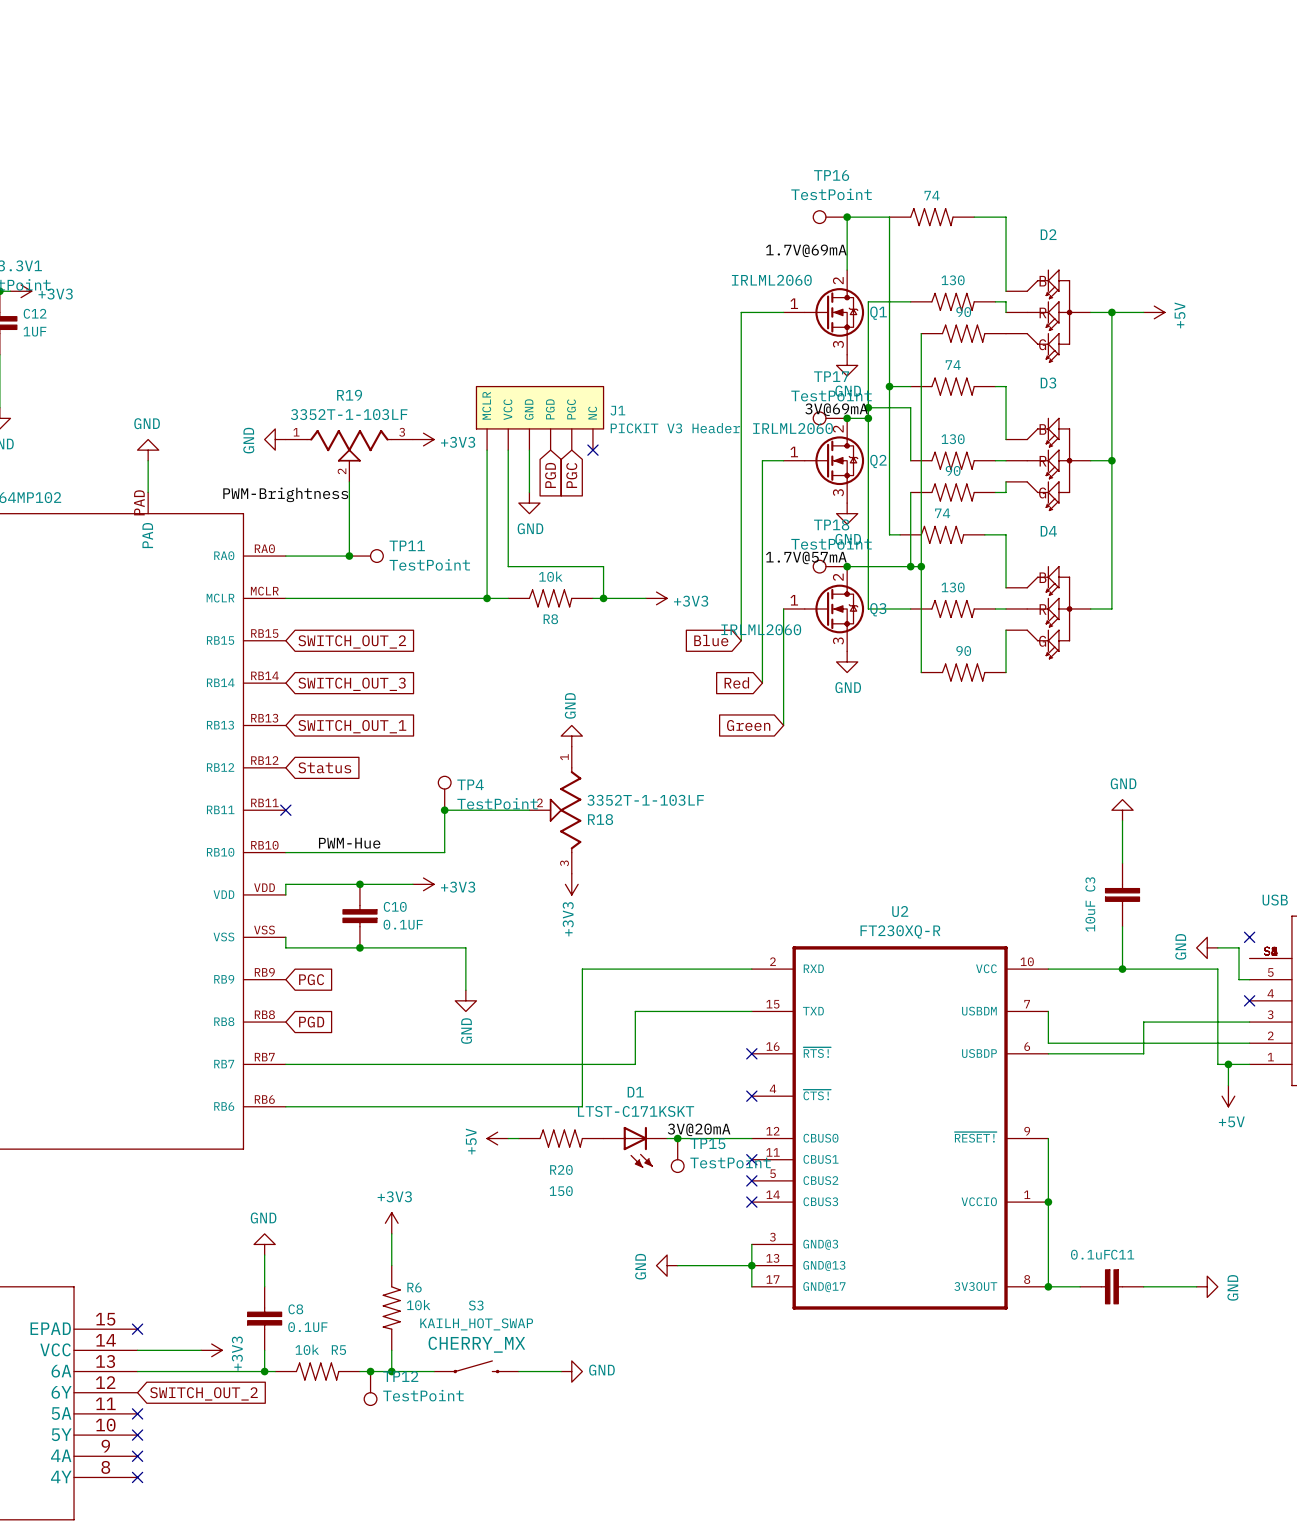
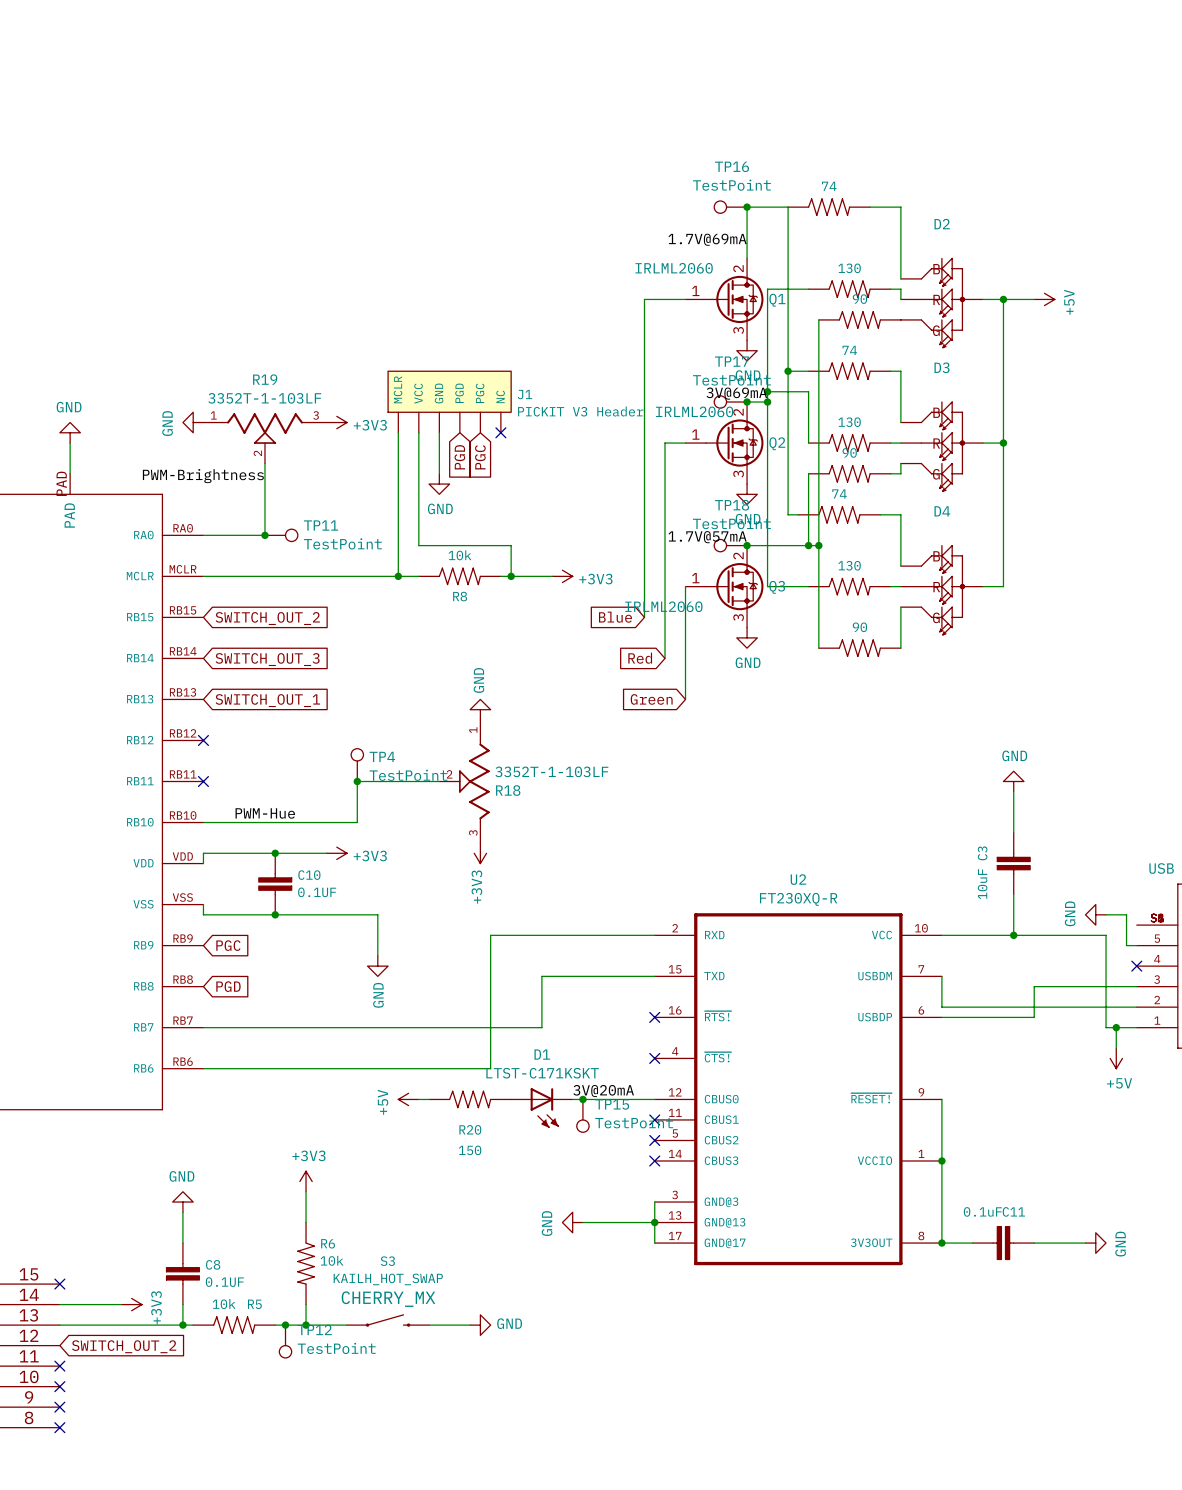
no-connect mark: none -> (203, 740)
global label: Status (324, 767) -> none
no-connect mark: (1249, 937) -> none

